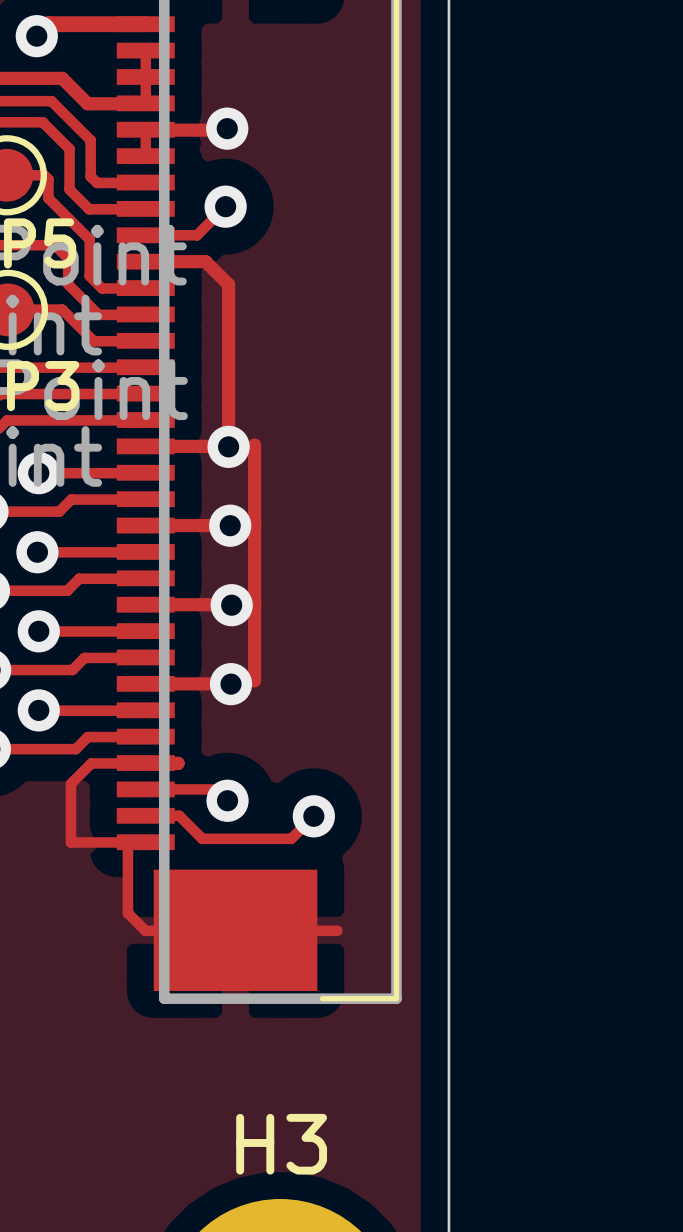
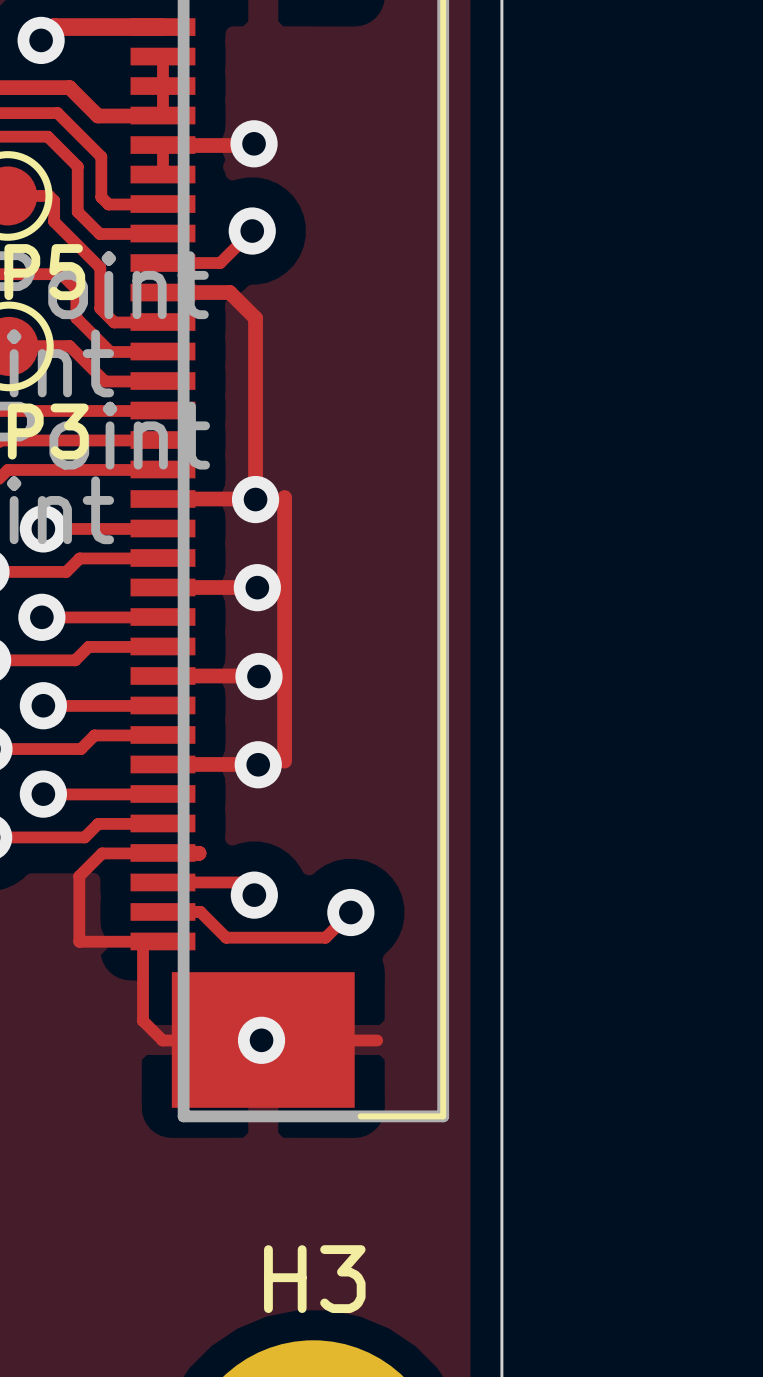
via: none -> (261, 1040)

